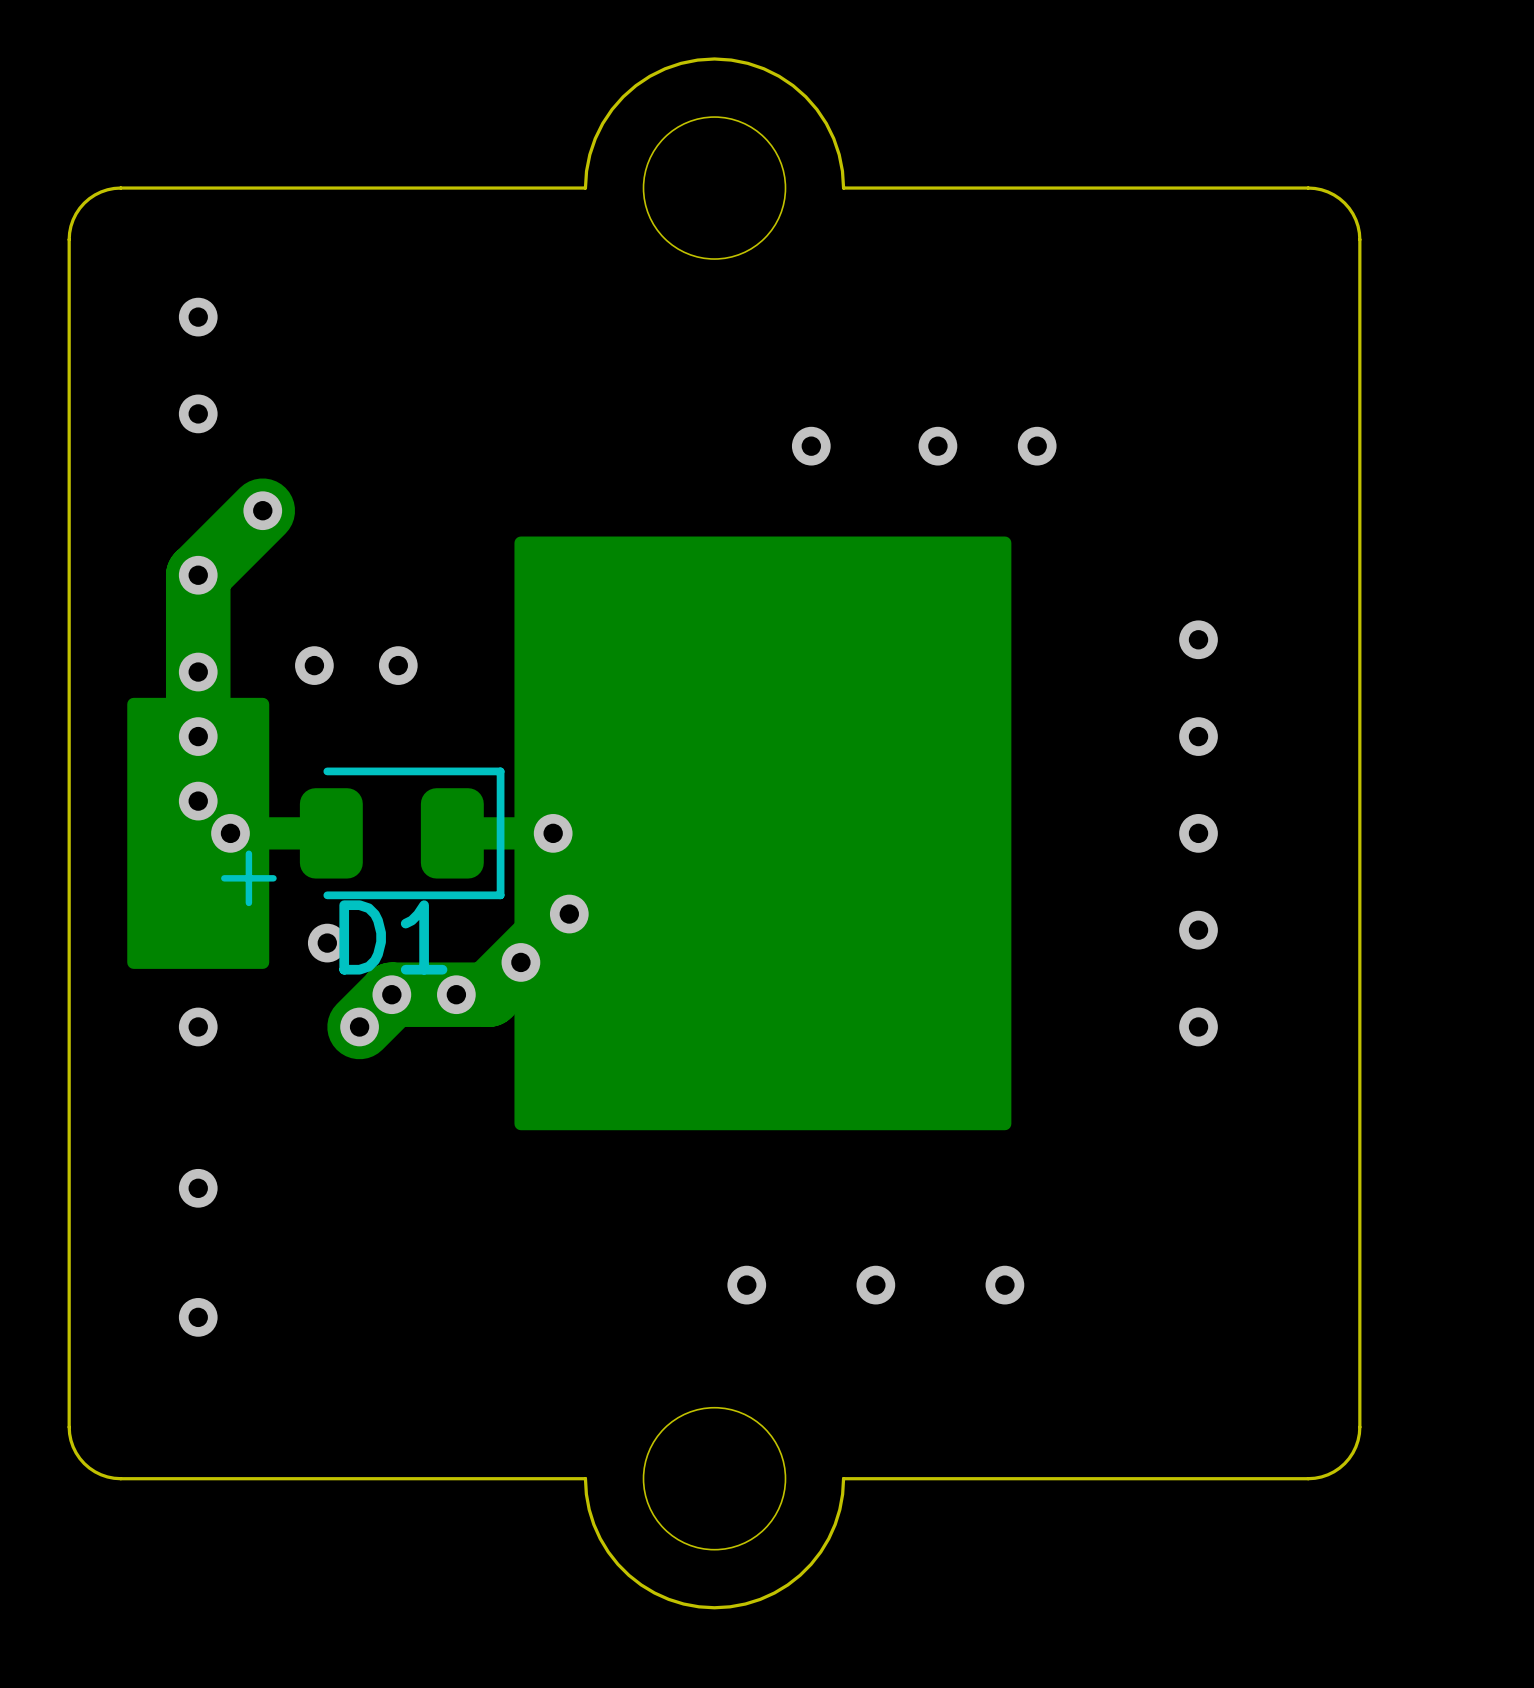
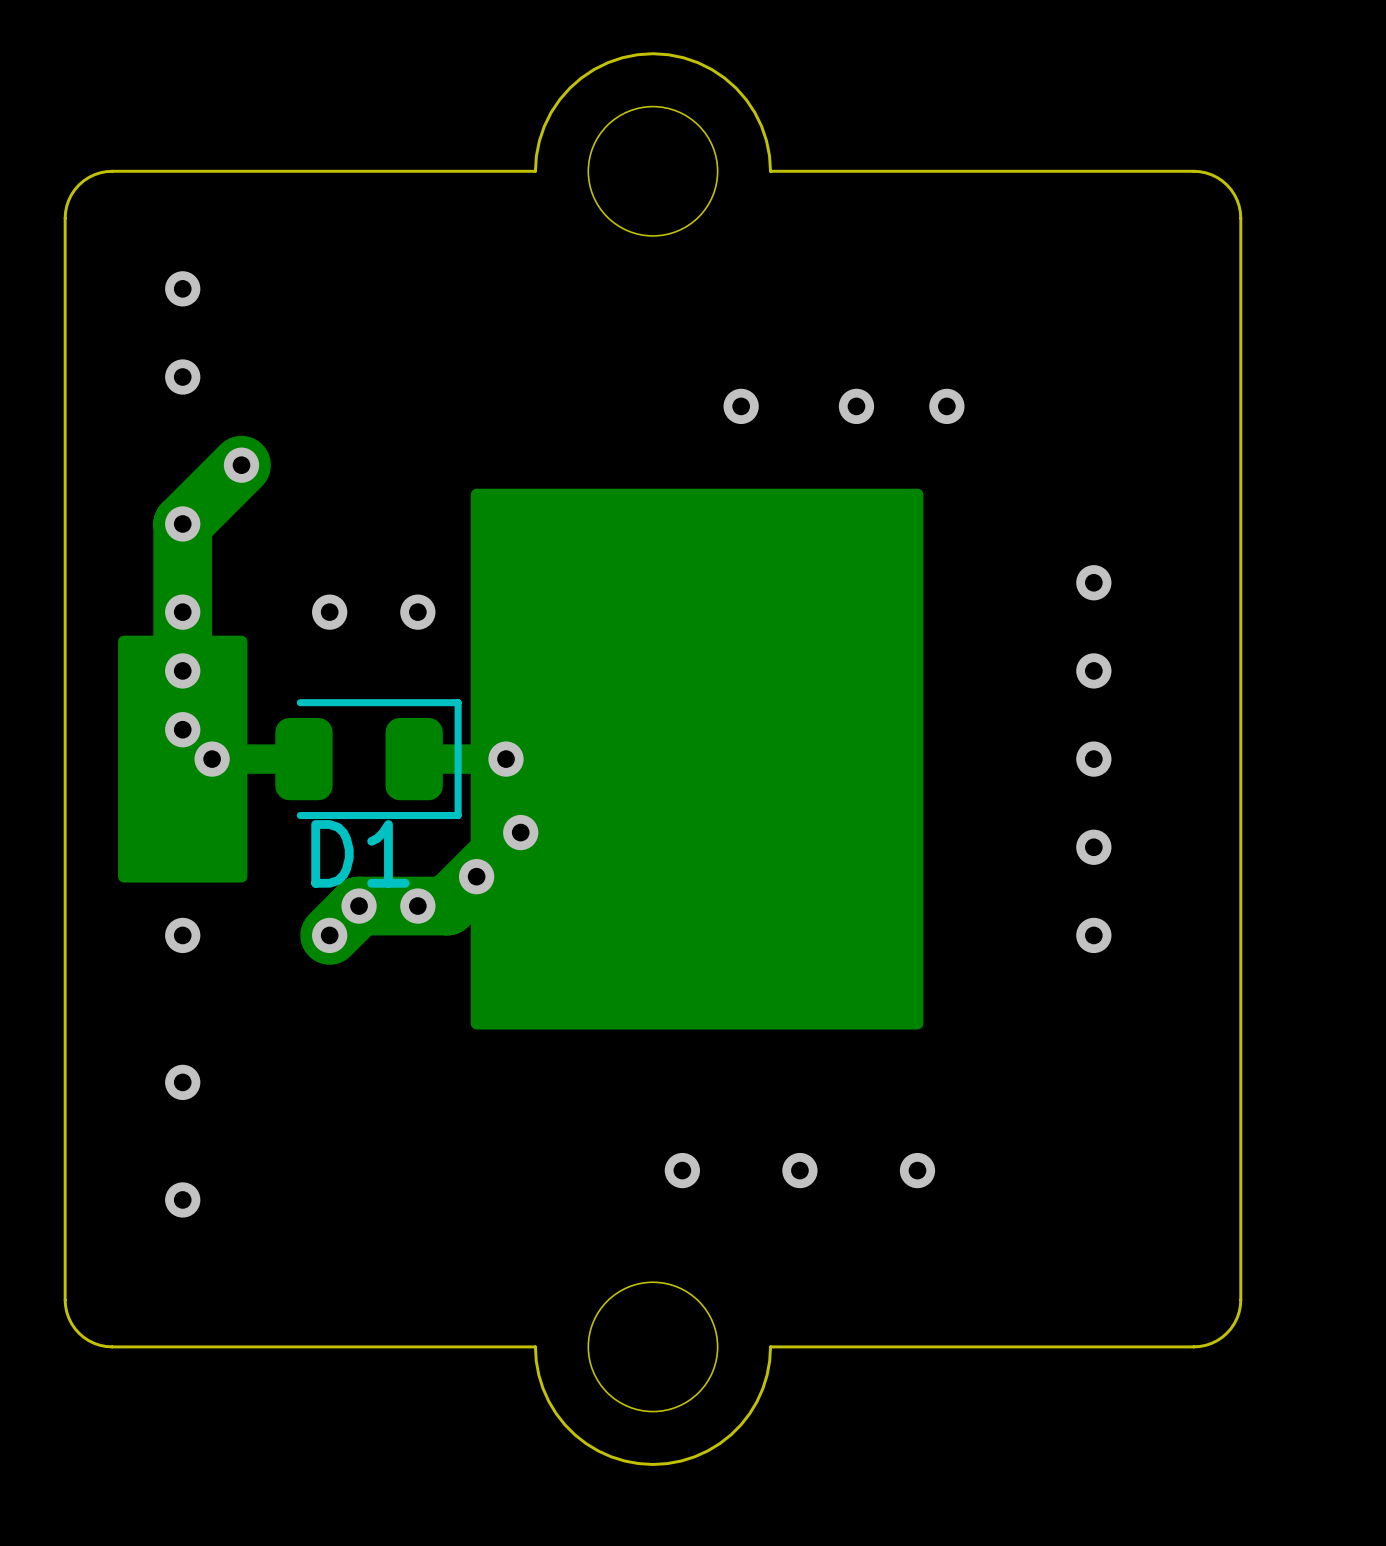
via: (314, 665) -> none
via position: (398, 665) -> (329, 612)
via: none -> (417, 612)
text: + (248, 878) -> none
via: (327, 943) -> none

